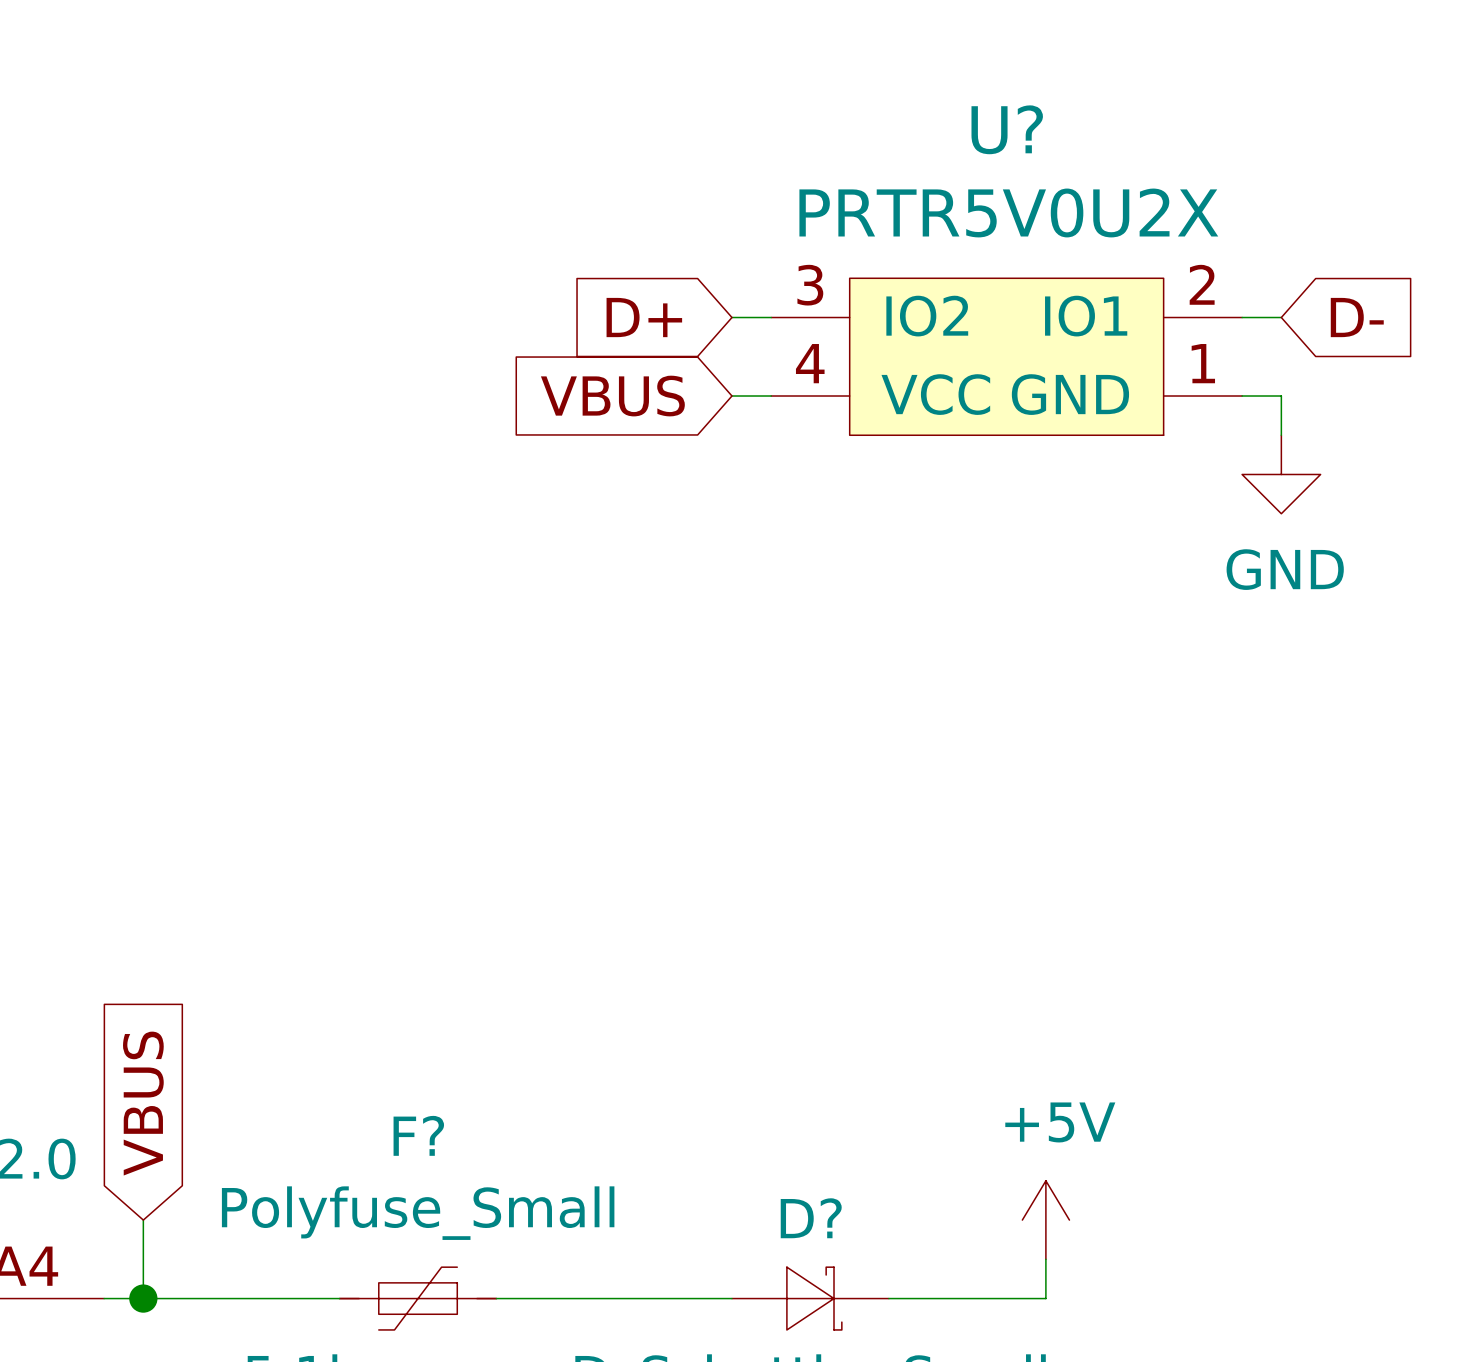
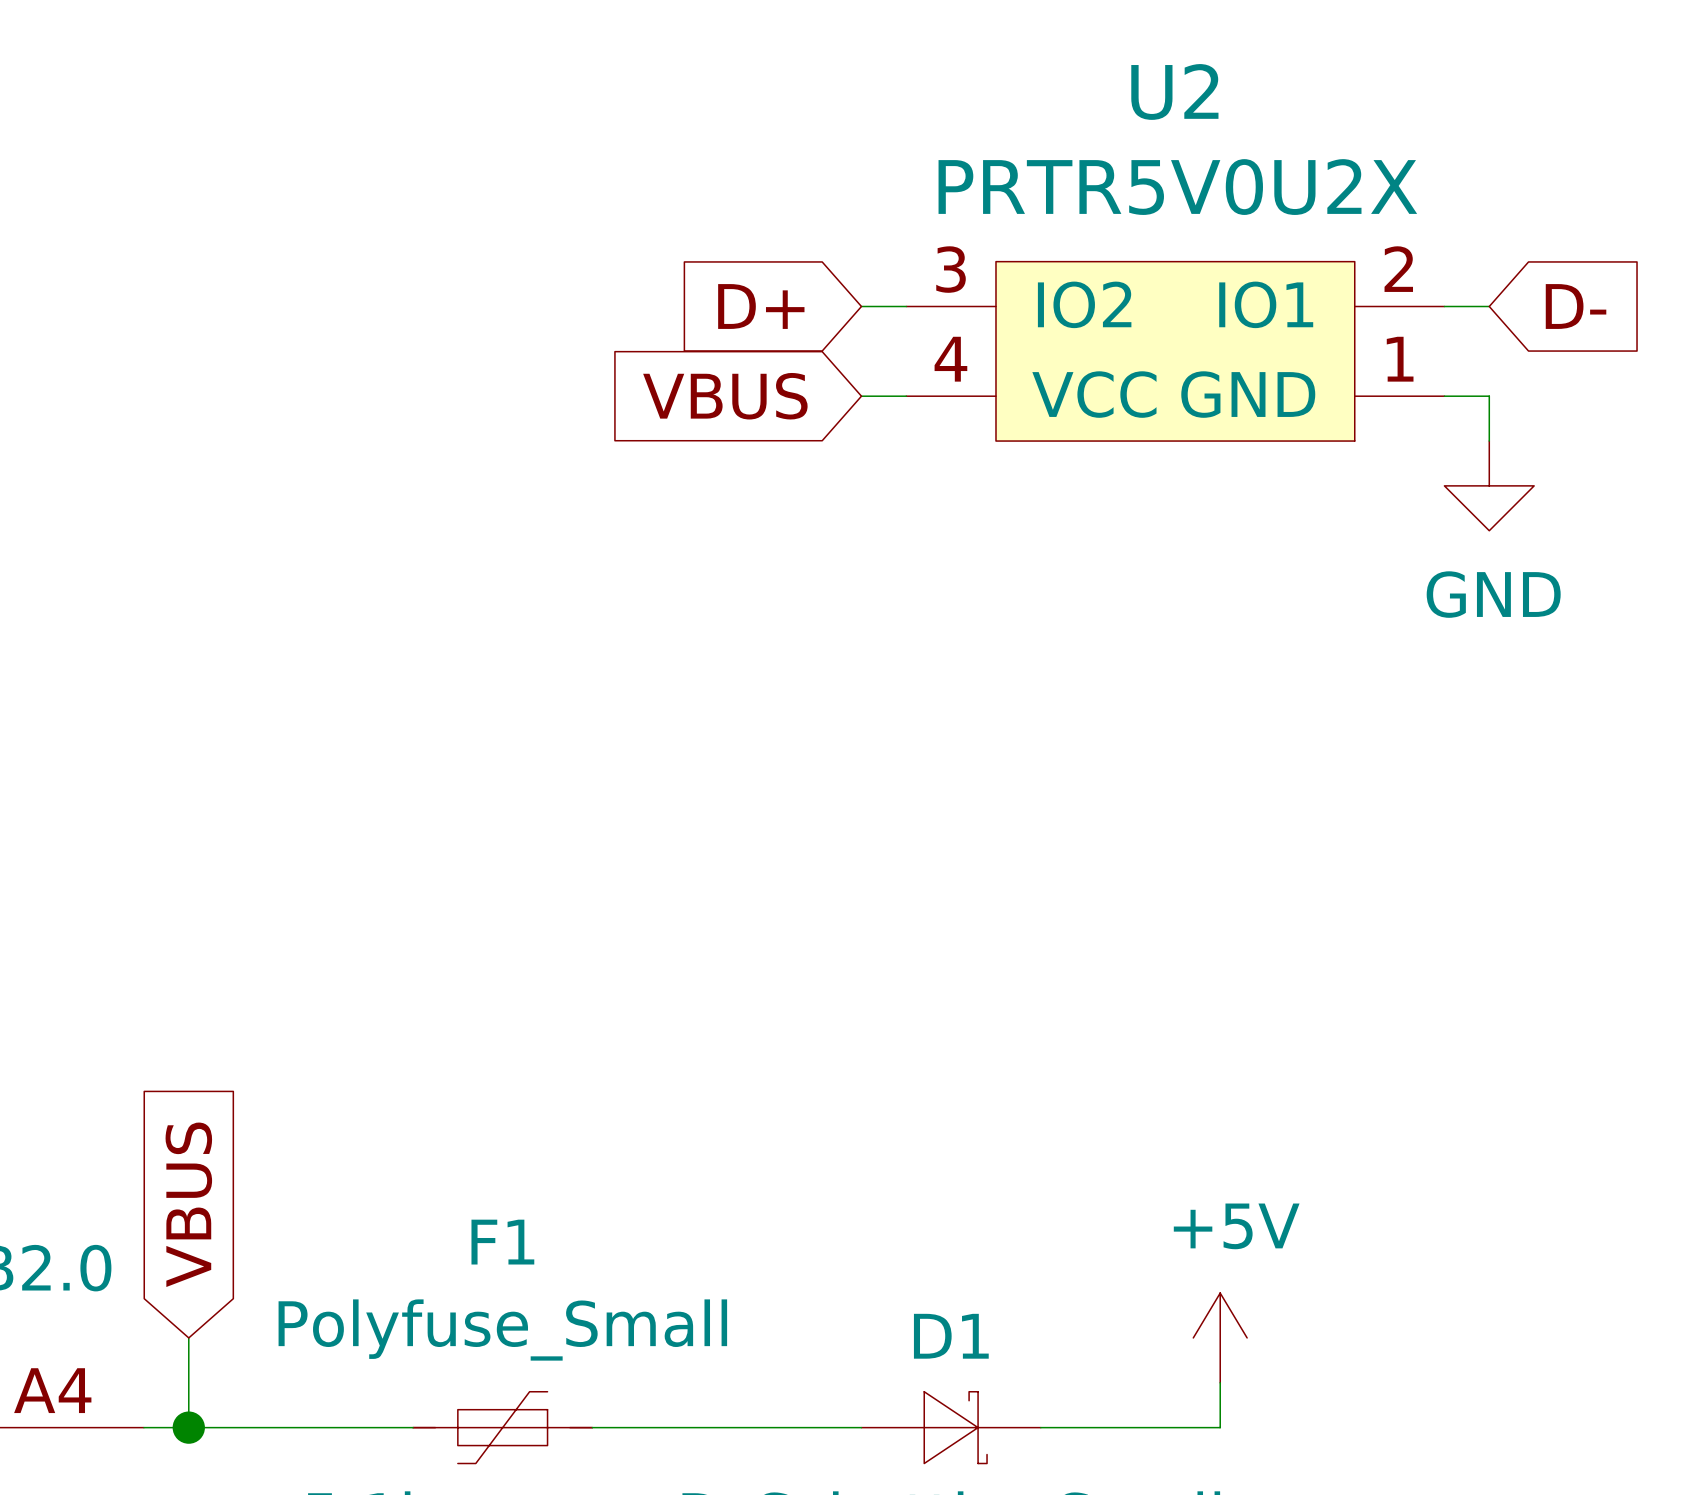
U? name: U? (1007, 129) -> U2 (1174, 91)
F? name: F? (418, 1135) -> F1 (502, 1242)
D? name: D? (811, 1218) -> D1 (951, 1336)

